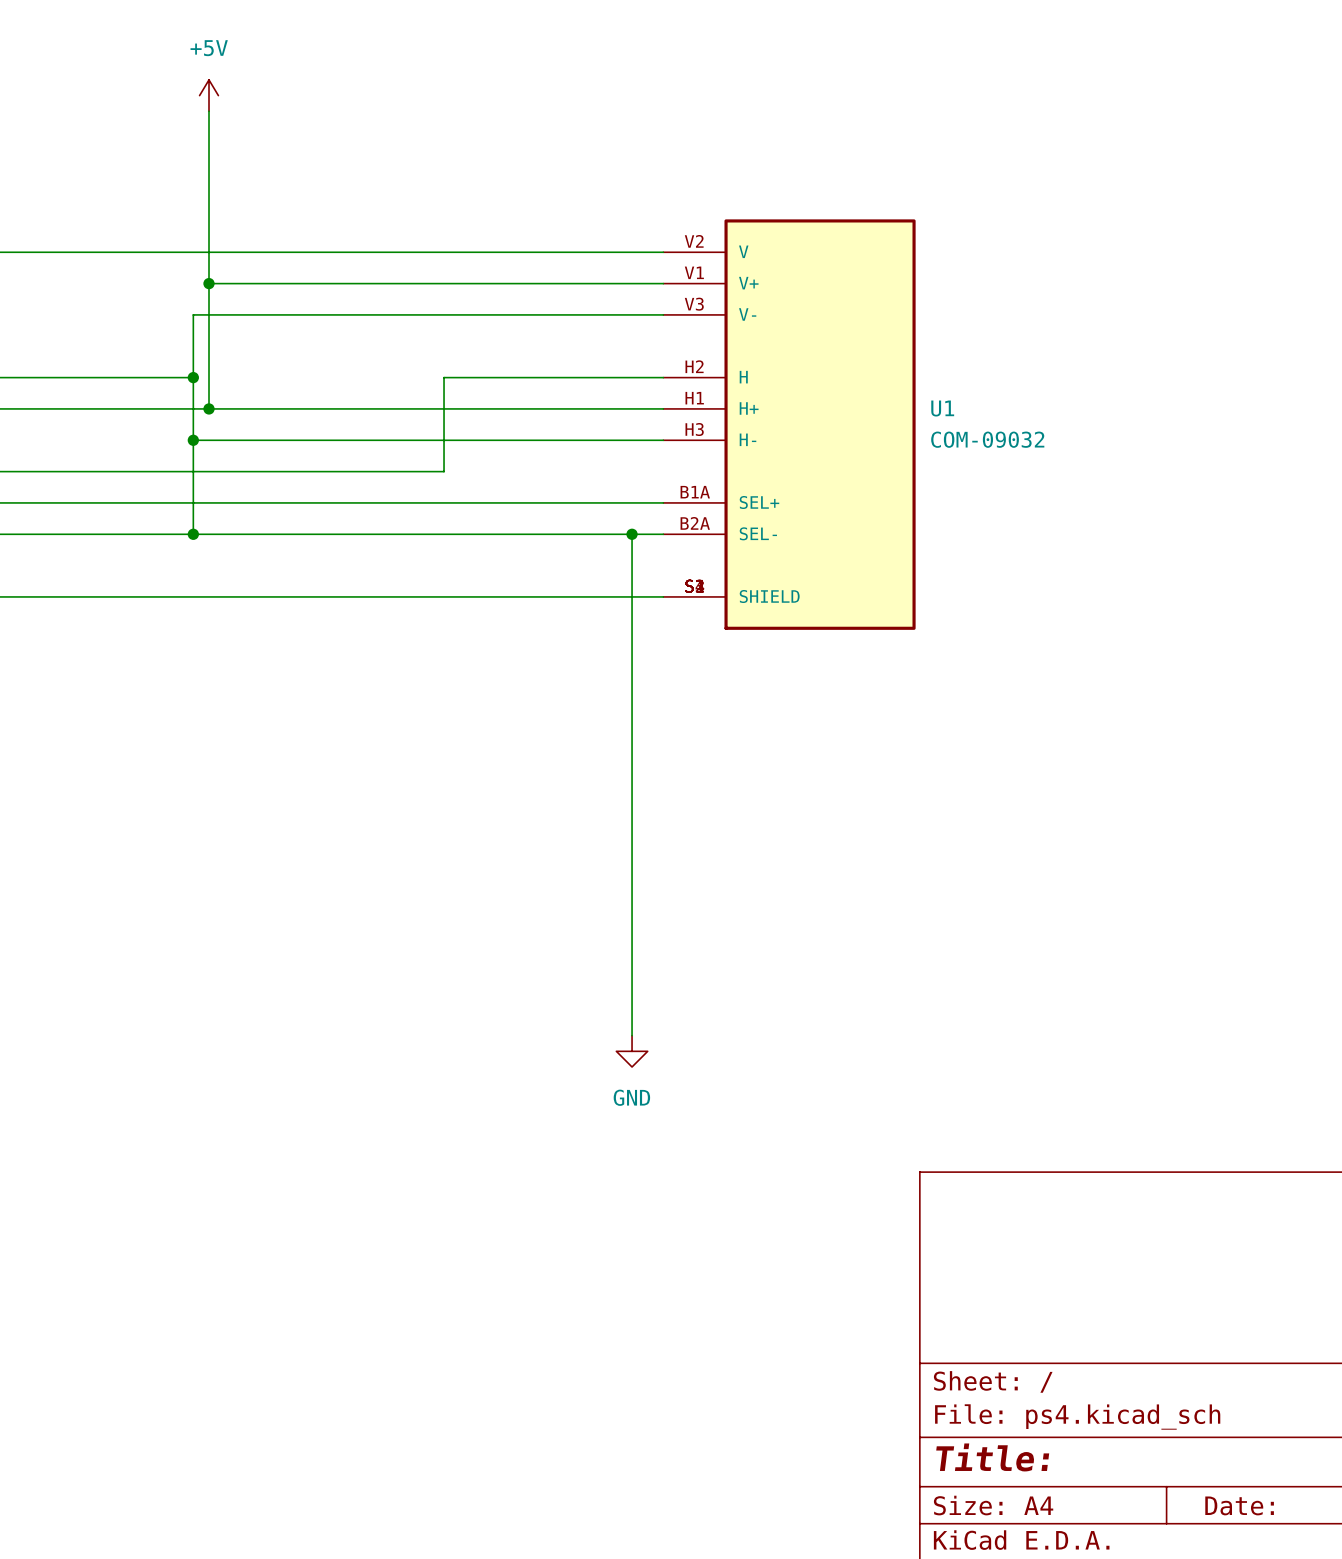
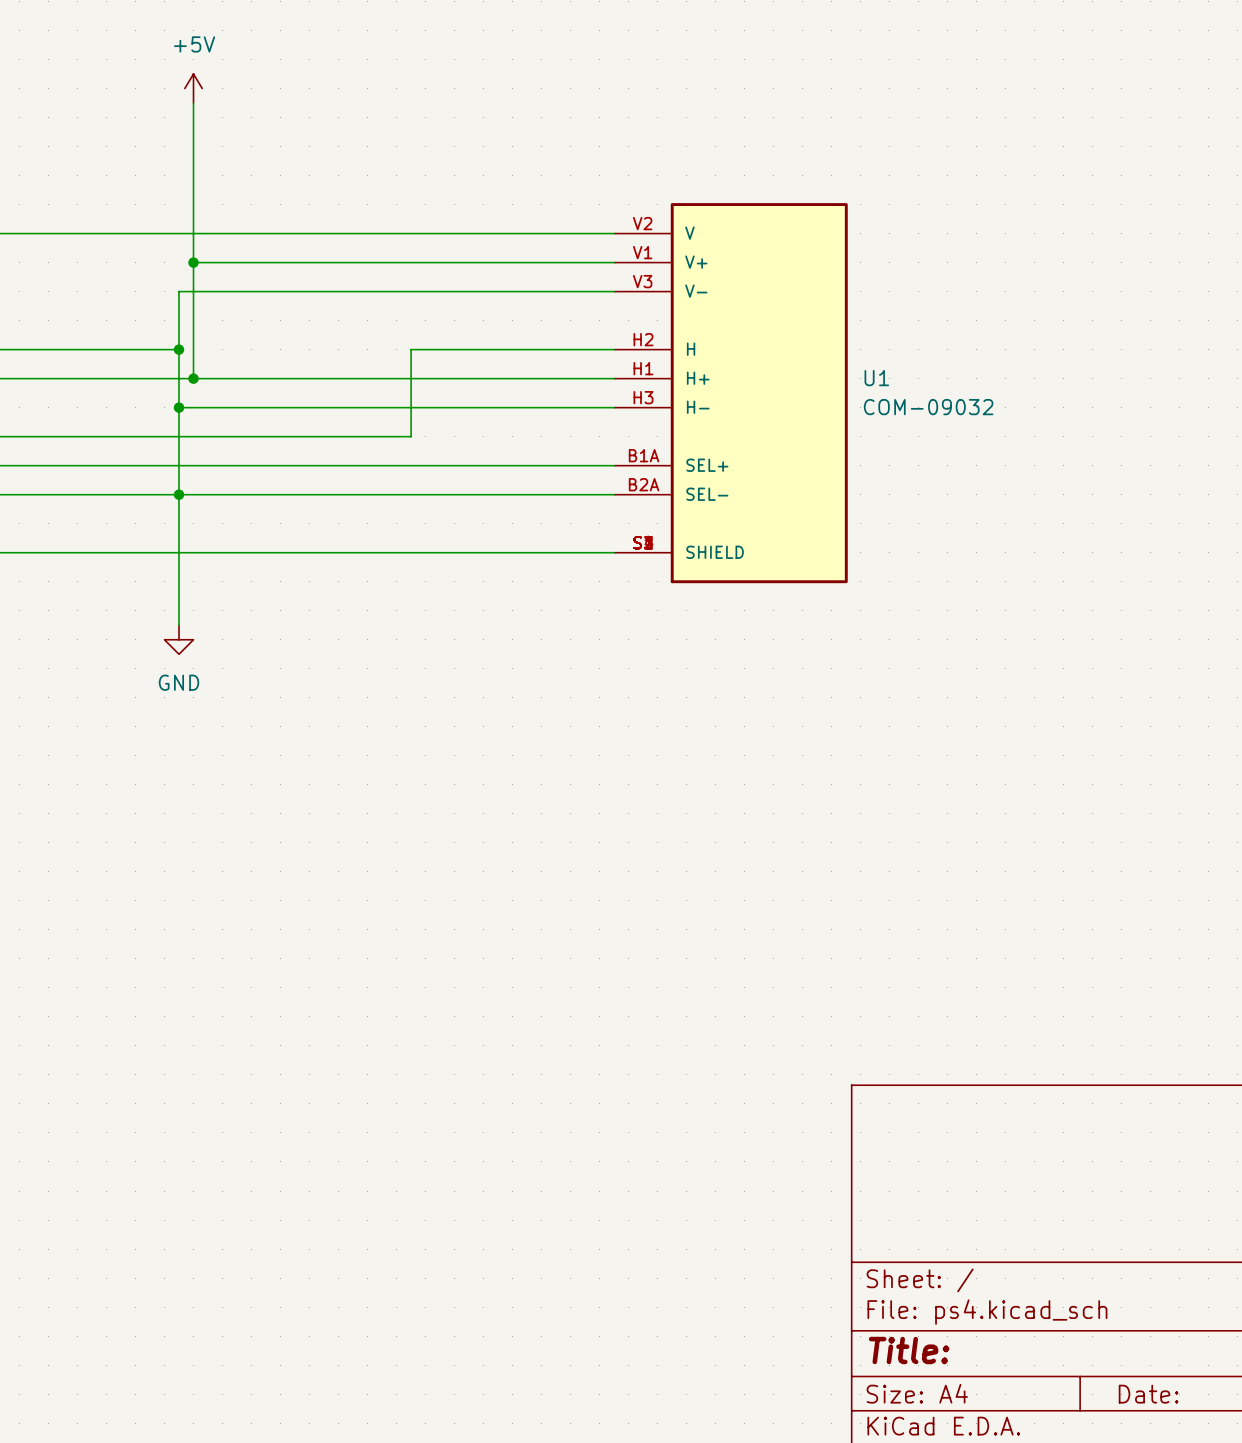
wire: none -> (179, 494) (179, 625)
wire: (632, 534) (632, 1035) -> none
junction: (632, 534) -> none
power symbol: none -> GND (179, 639)
power symbol: GND (632, 1051) -> none

